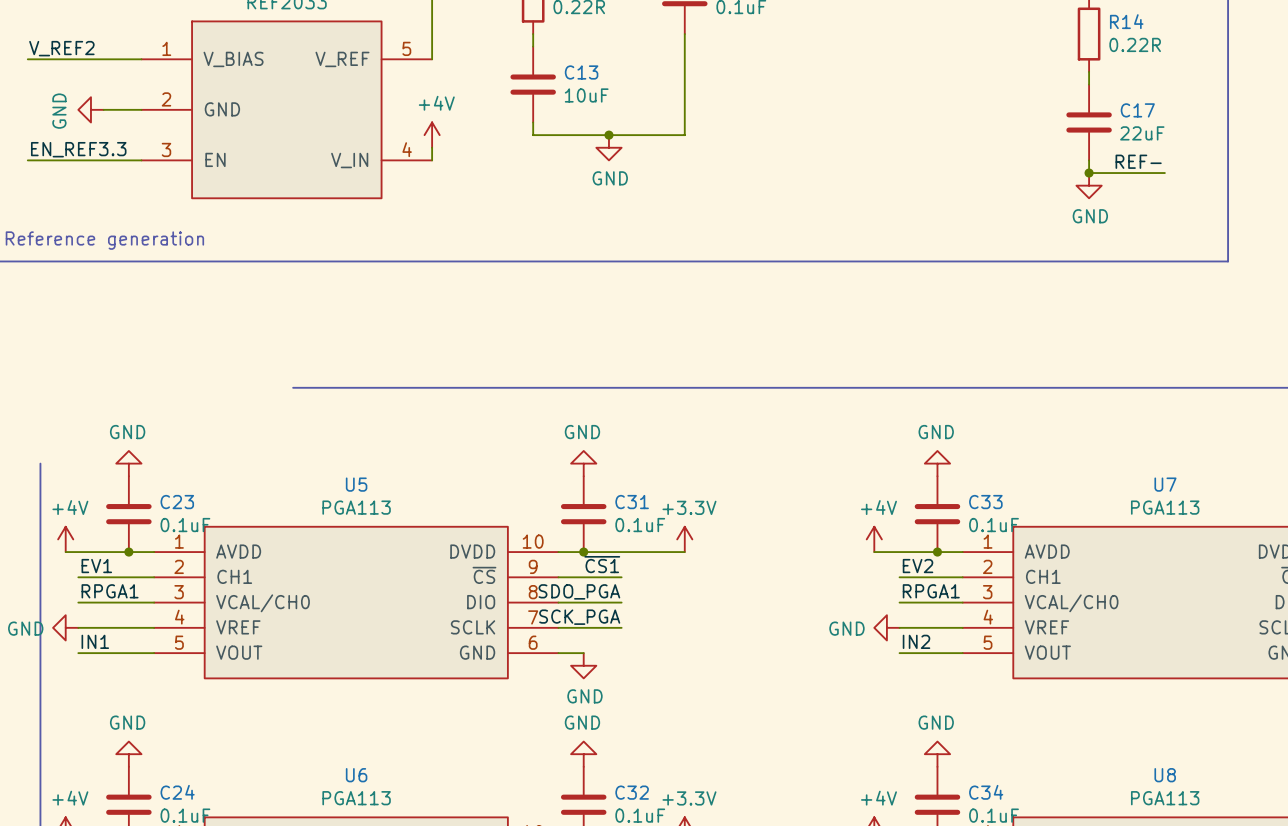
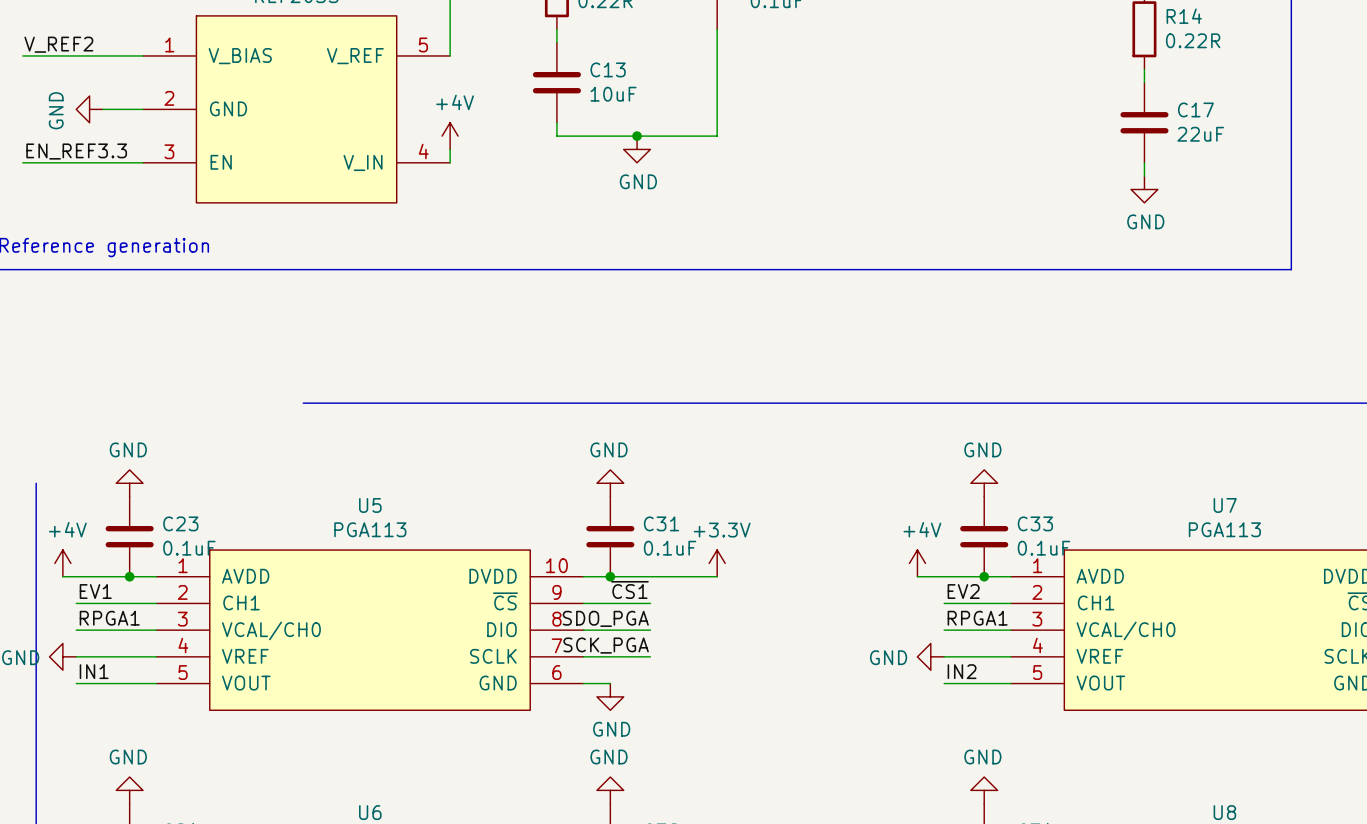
label: REF- (1138, 161) -> none
wire: (1089, 173) (1164, 173) -> none
junction: (1089, 173) -> none

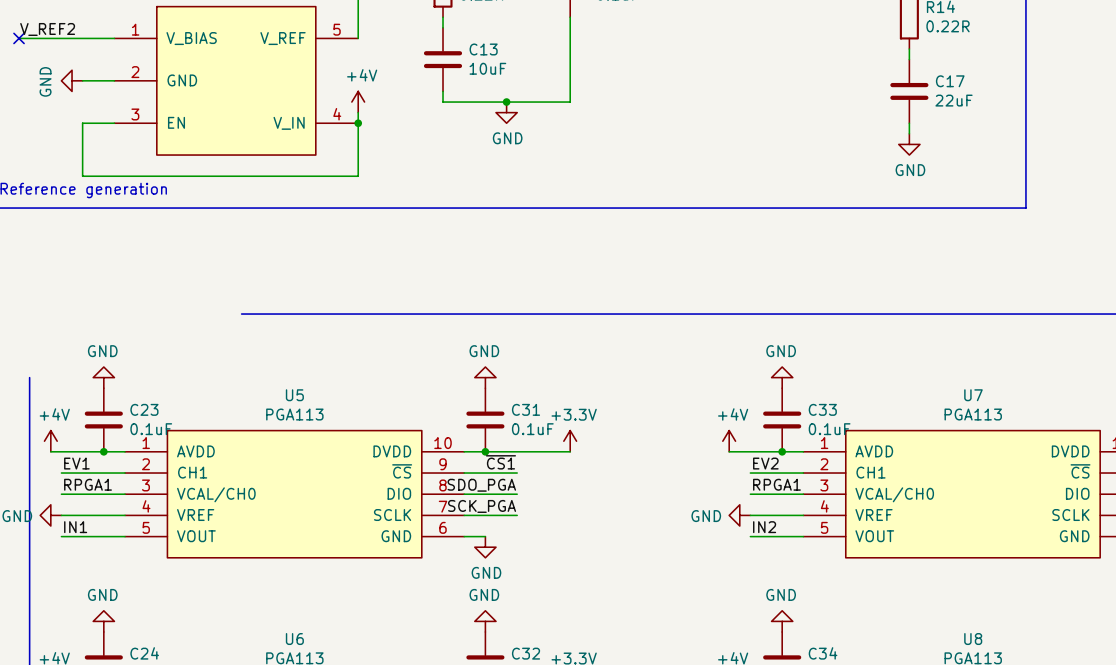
no-connect mark: none -> (19, 38)
label: EN_REF3.3 (76, 151) -> none
wire: (22, 162) (102, 162) -> (358, 123) (358, 176) (82, 176) (82, 123)
junction: none -> (358, 123)

